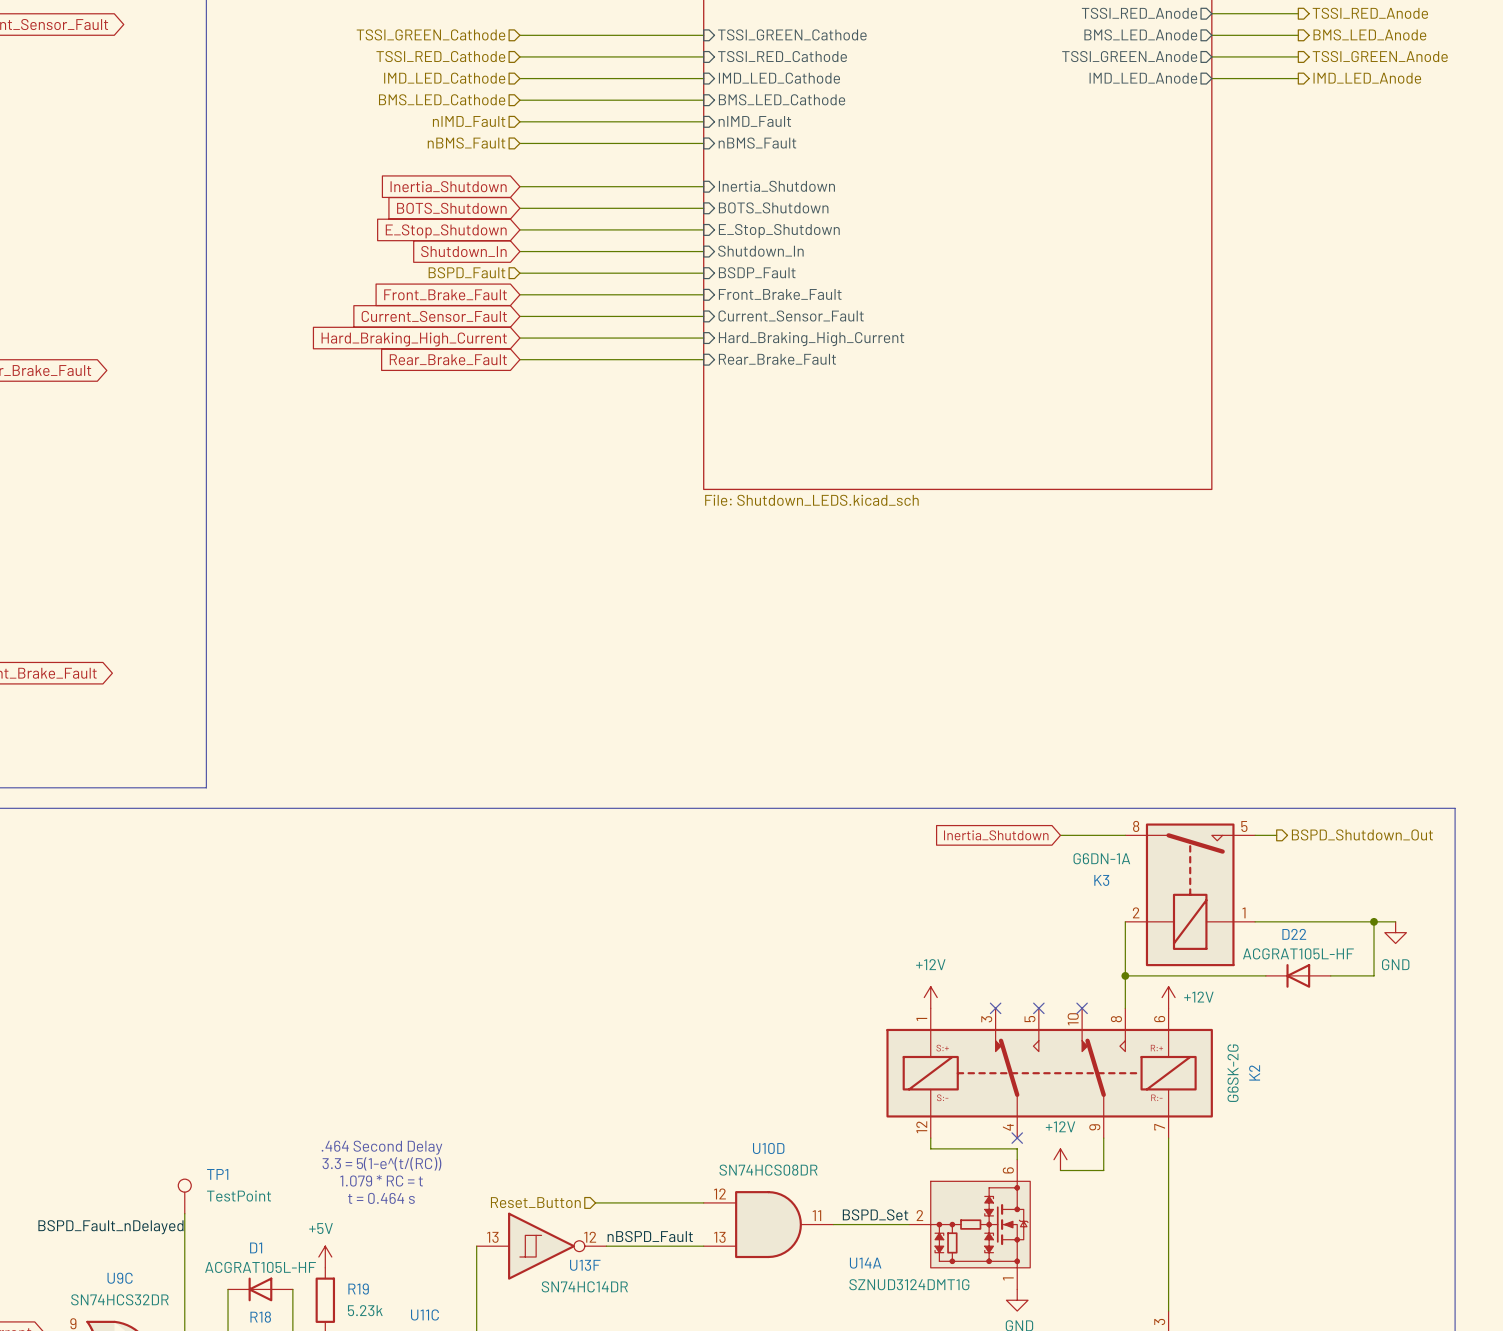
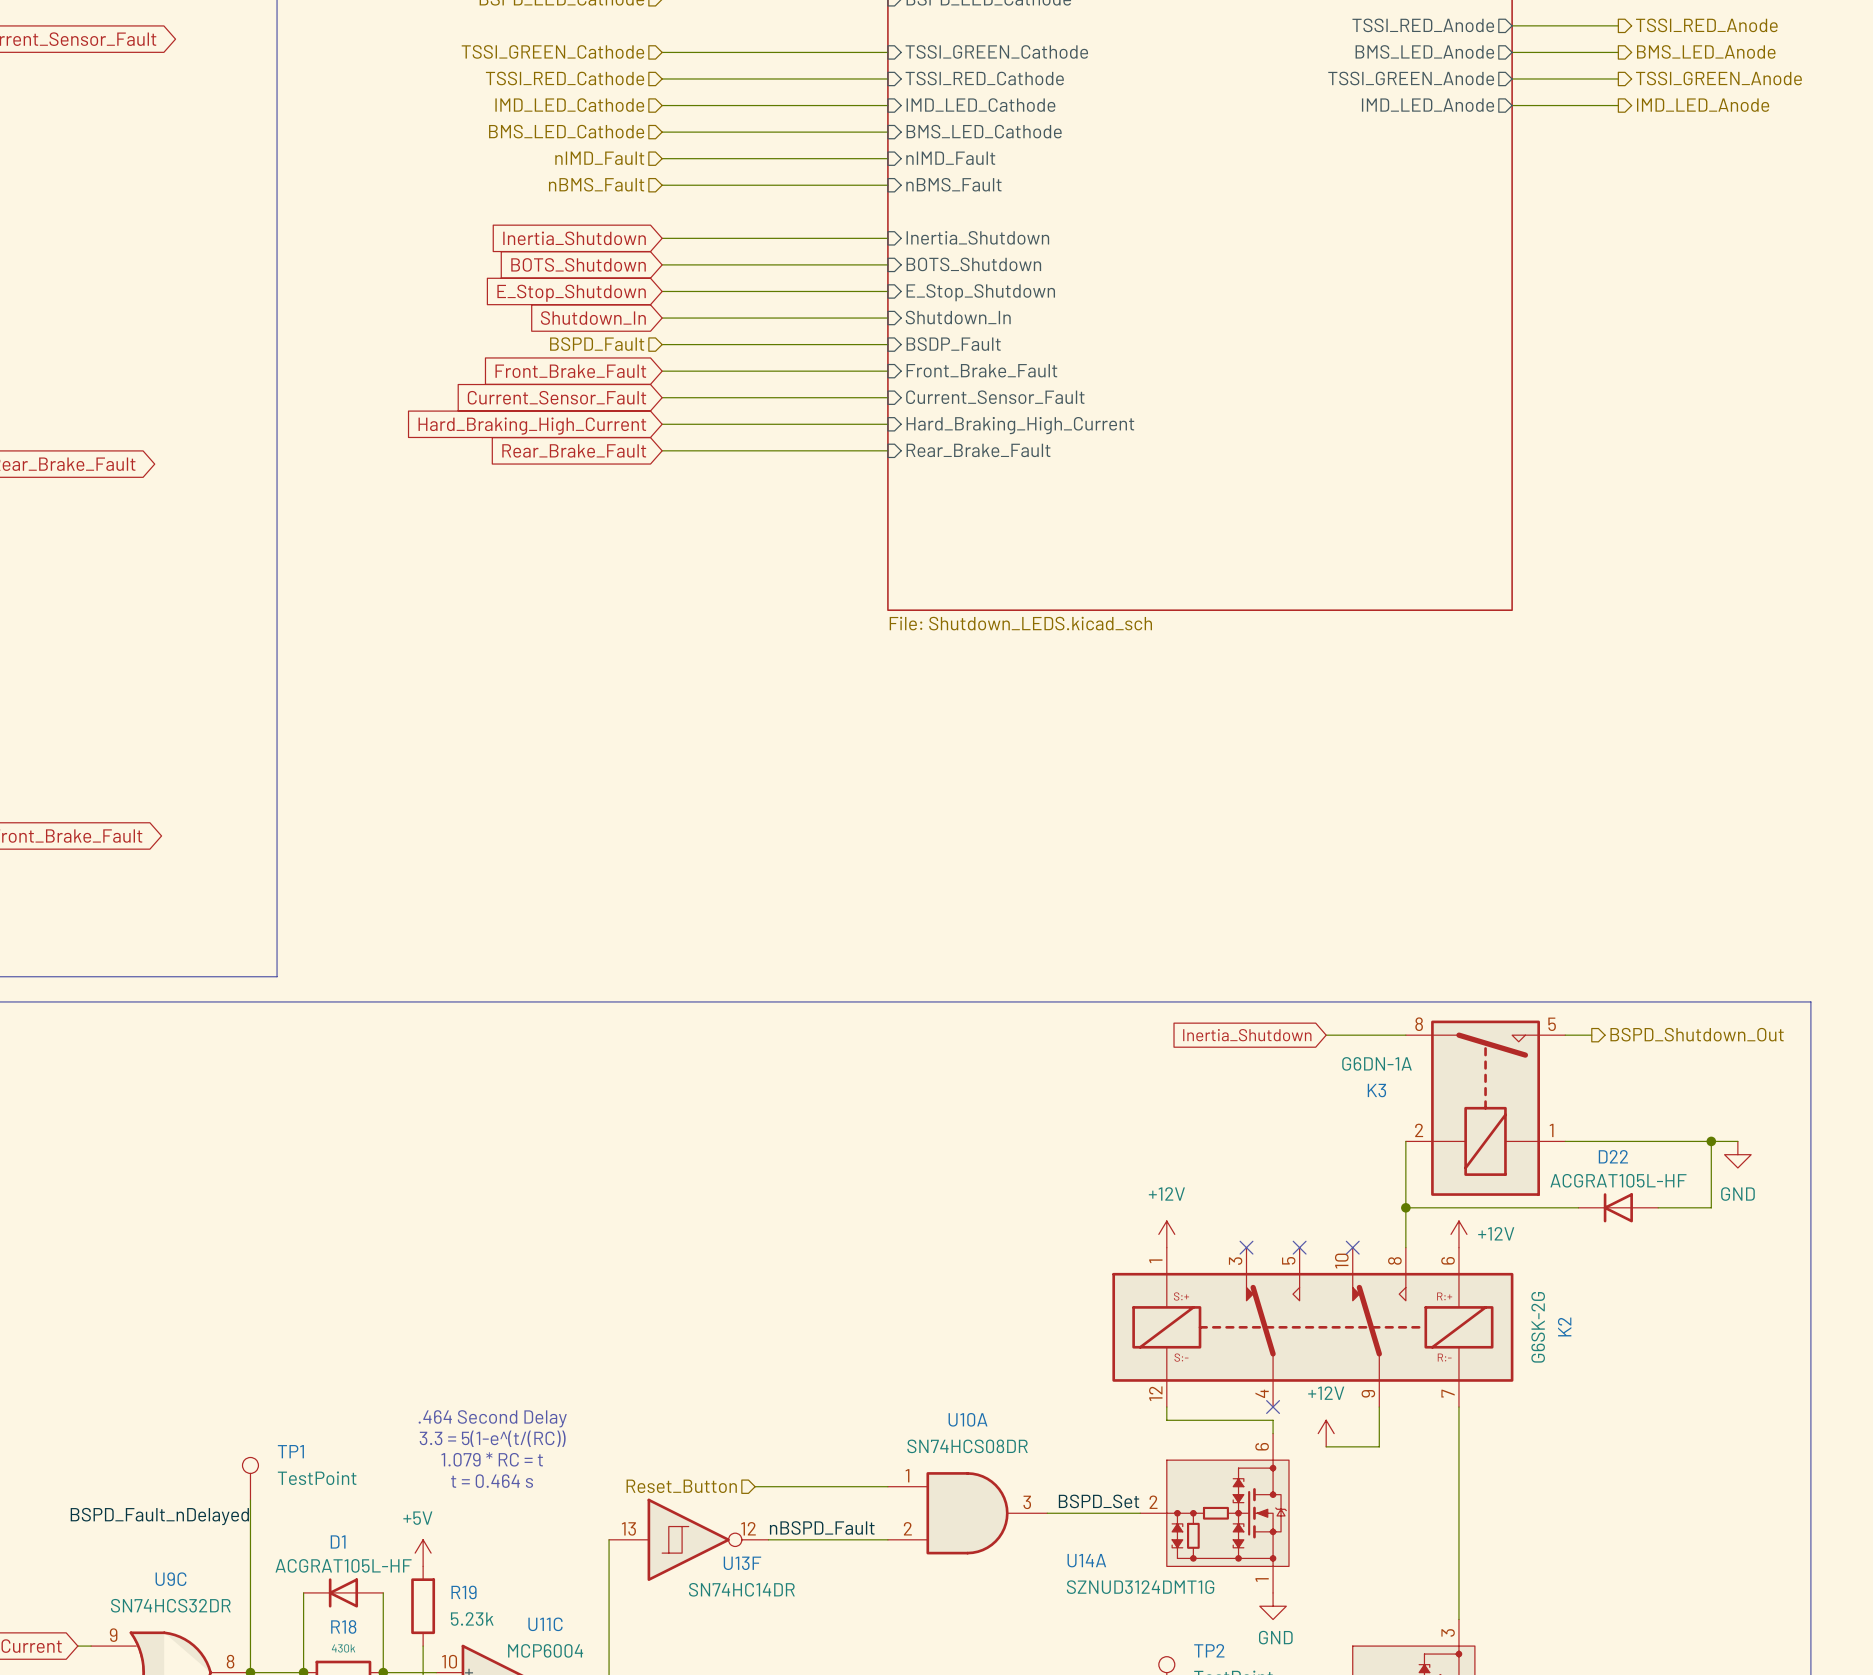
U10D name: U10D (768, 1148) -> U10A (968, 1419)
U10D pin number: 12 (719, 1193) -> 1 (907, 1475)
U10D pin number: 11 (816, 1215) -> 3 (1027, 1502)
U10D pin number: 13 (719, 1237) -> 2 (907, 1528)

